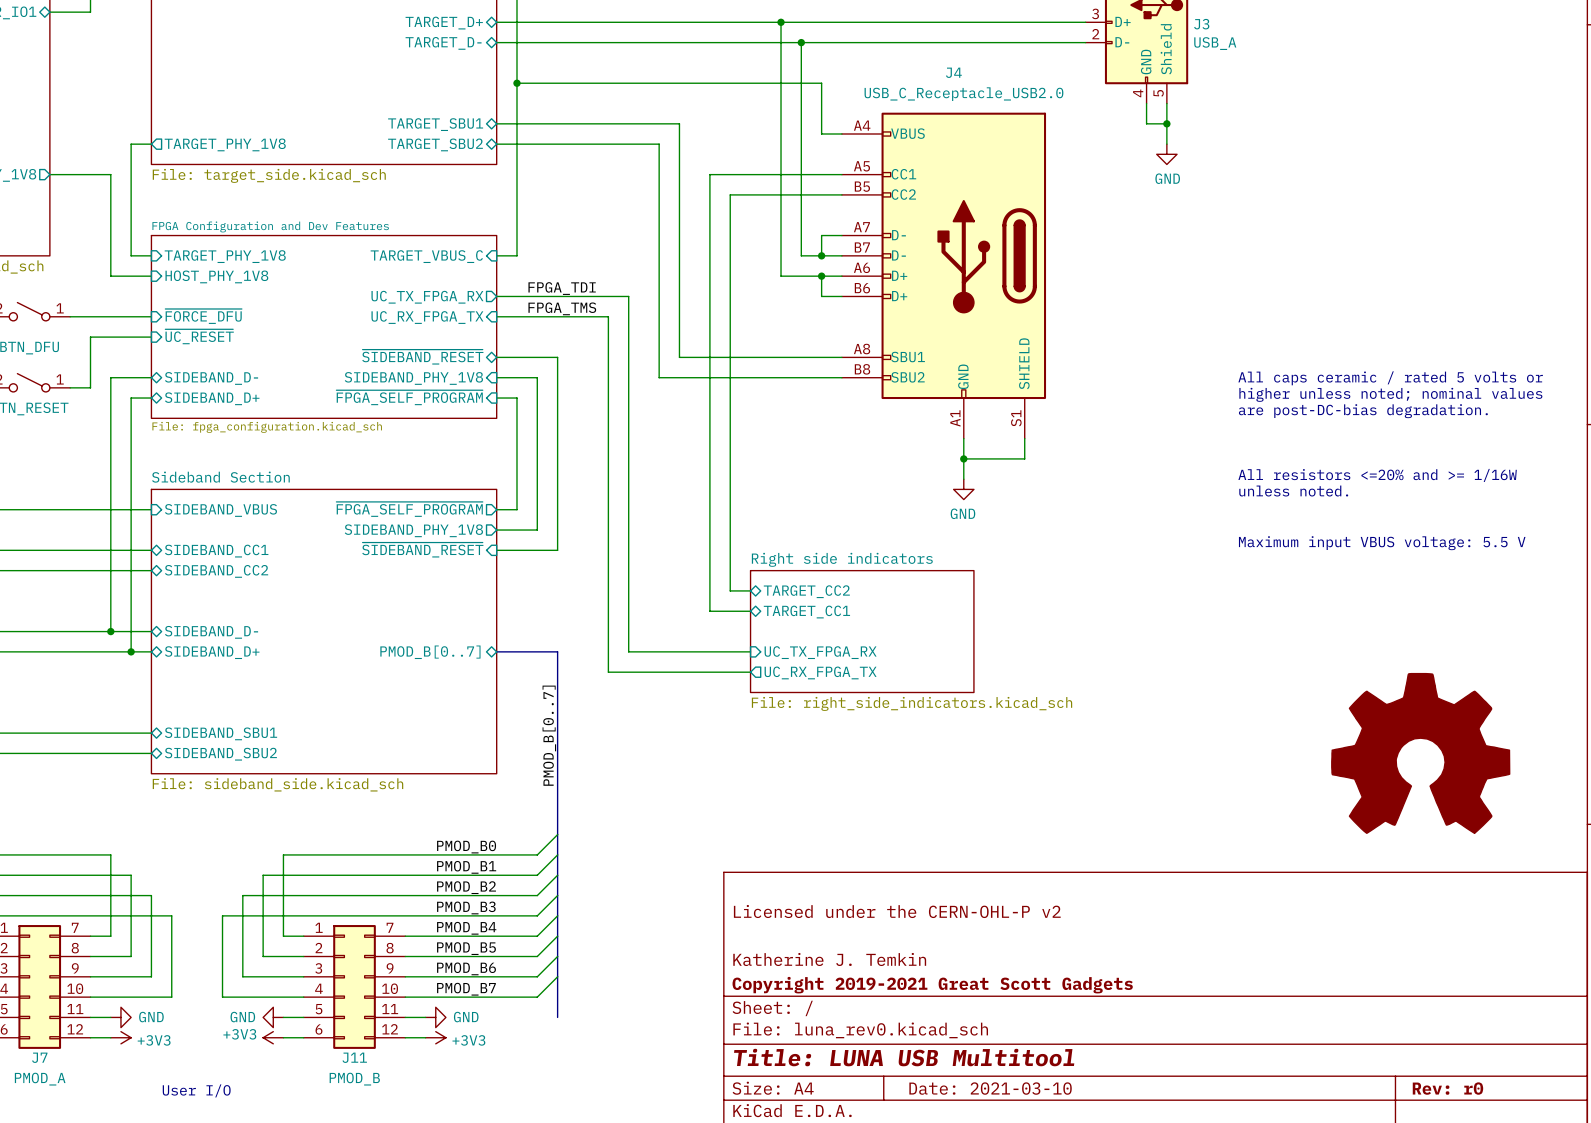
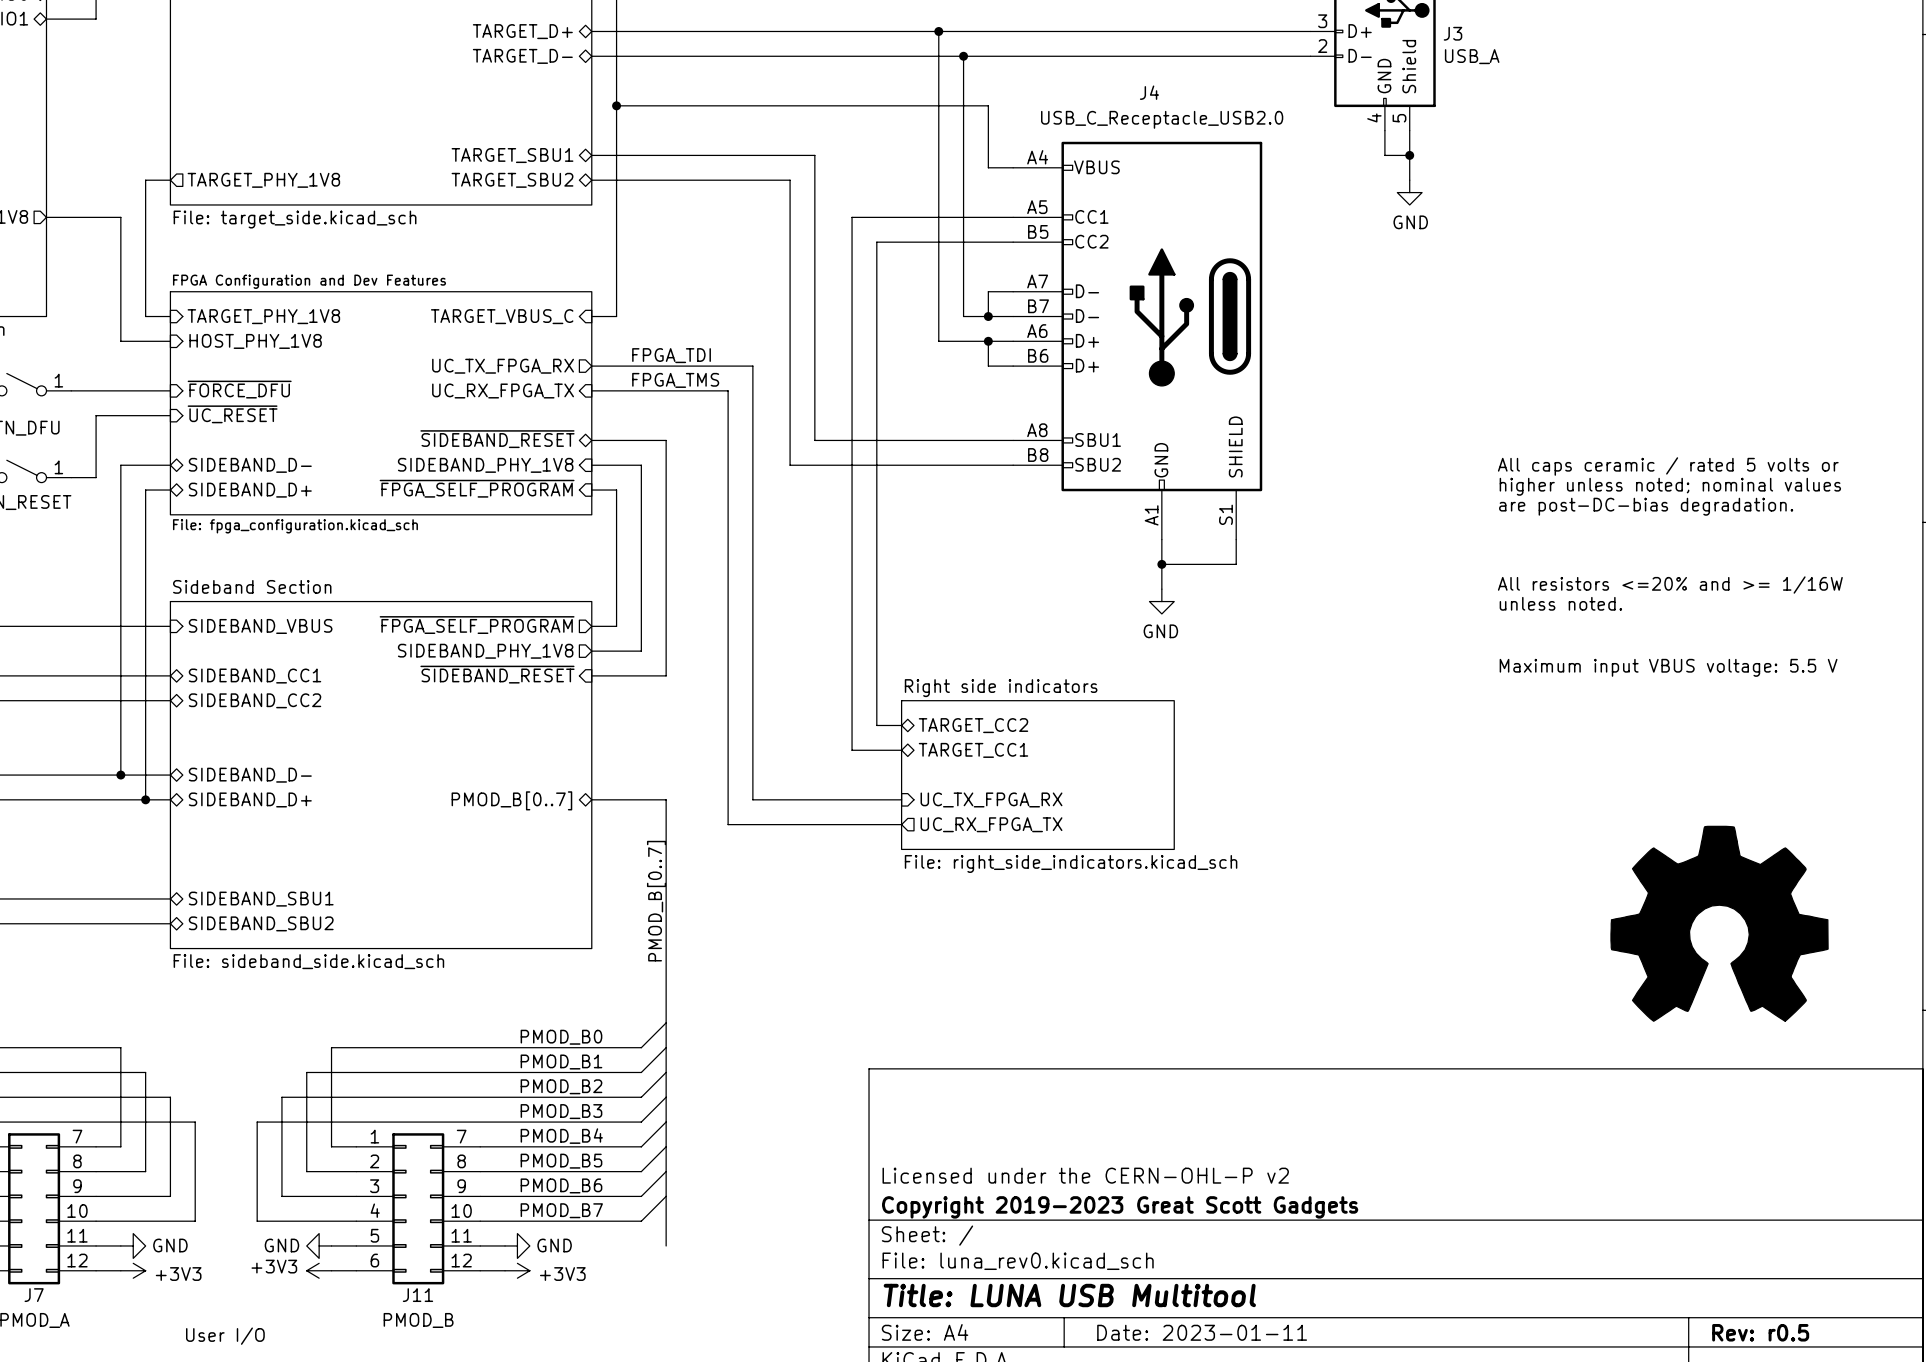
title block: Licensed under the CERN-OHL-P v2 (897, 911) -> none
title block: Katherine J. Temkin (829, 959) -> Licensed under the CERN-OHL-P v2 (1085, 1175)
title block: Copyright 2019-2021 Great Scott Gadgets (932, 985) -> Copyright 2019-2023 Great Scott Gadgets (1120, 1207)
title block: Date: 2021-03-10 (990, 1088) -> Date: 2023-01-11 (1202, 1332)
title block: Rev: r0 (1447, 1088) -> Rev: r0.5 (1760, 1332)

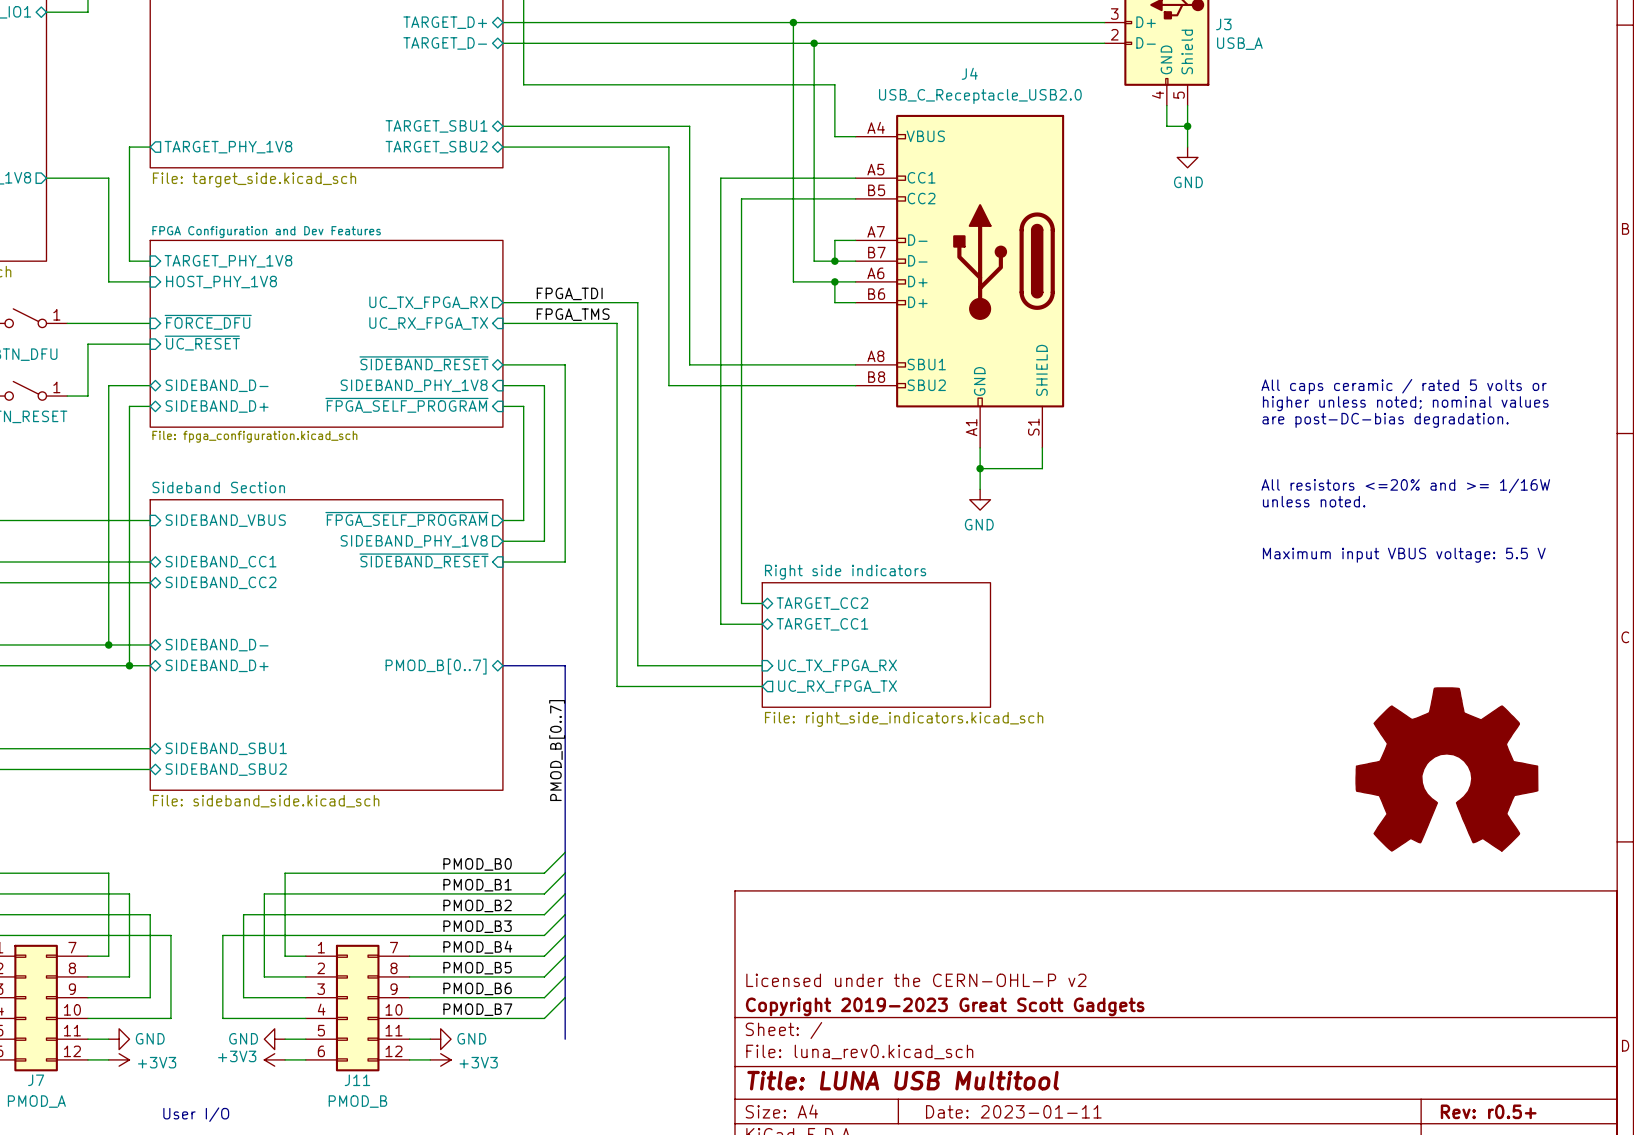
wire: (616, 105) (616, 316) (591, 316) -> none
junction: (616, 105) -> none
sheet pin: TARGET_VBUS_C (502, 316) -> none
title block: Rev: r0.5 (1760, 1332) -> Rev: r0.5+ (1488, 1111)

